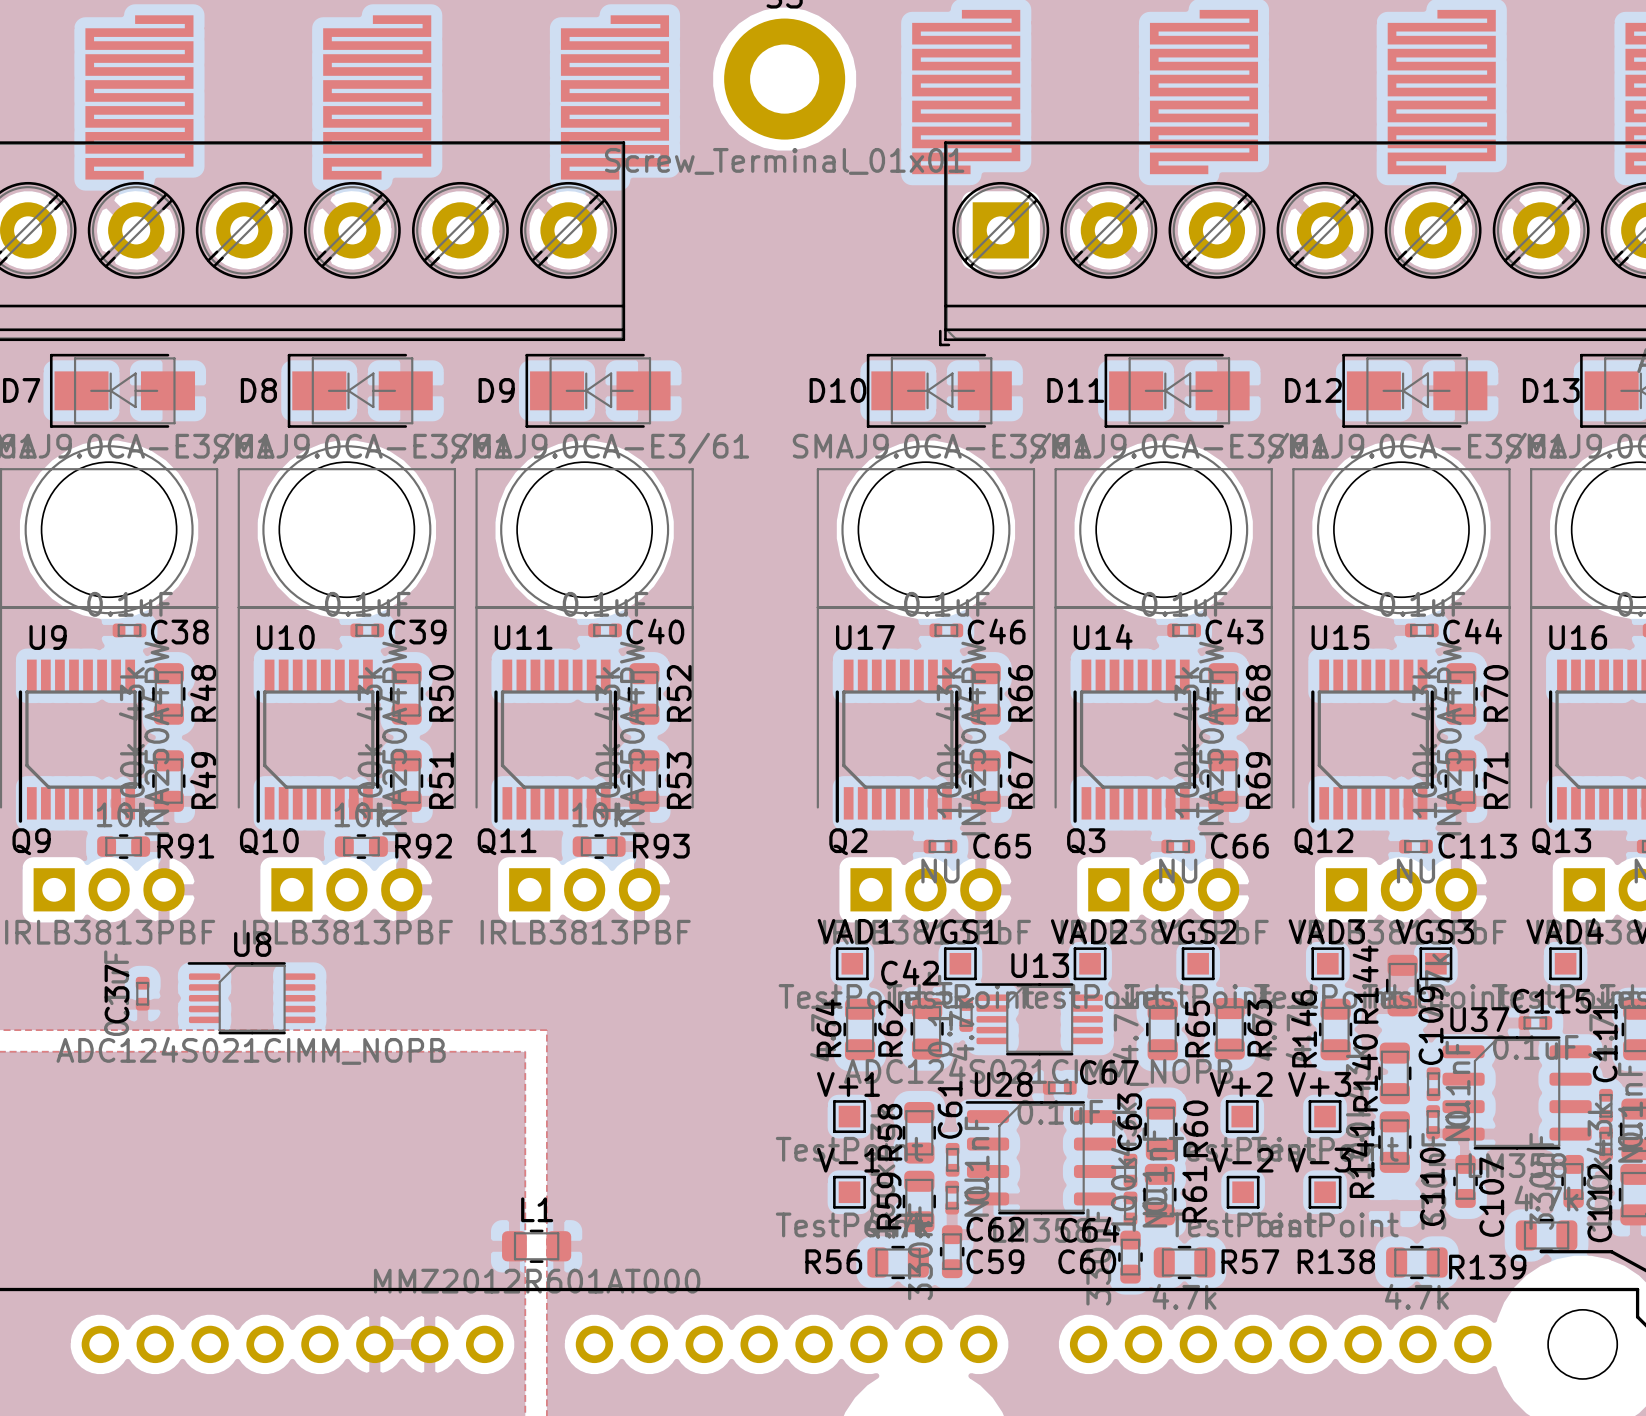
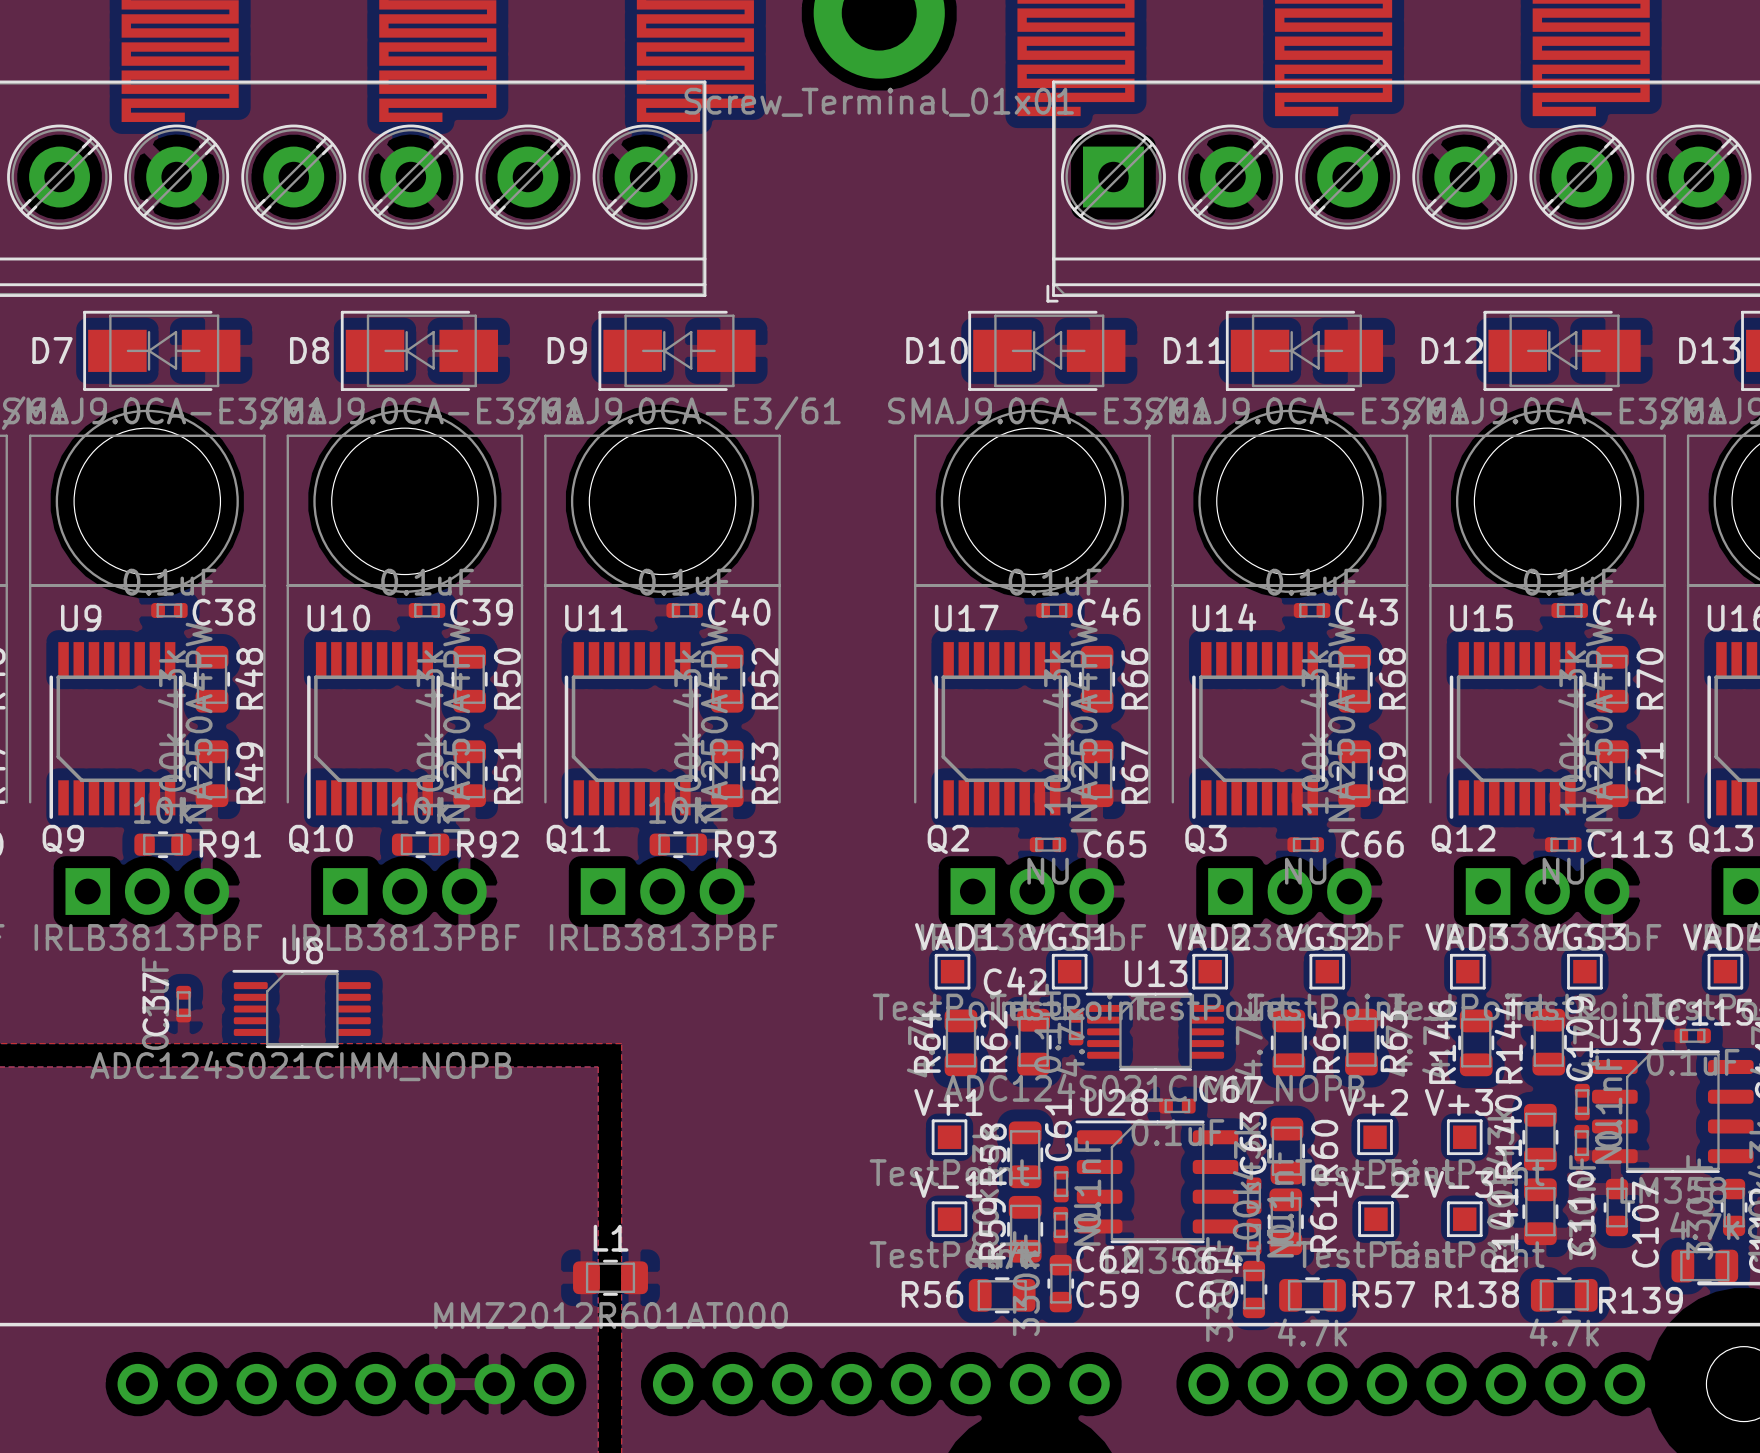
R144 position: (1402, 985) -> (1548, 1042)
R140 position: (1394, 1073) -> (1540, 1137)
R141 position: (1394, 1142) -> (1540, 1211)

